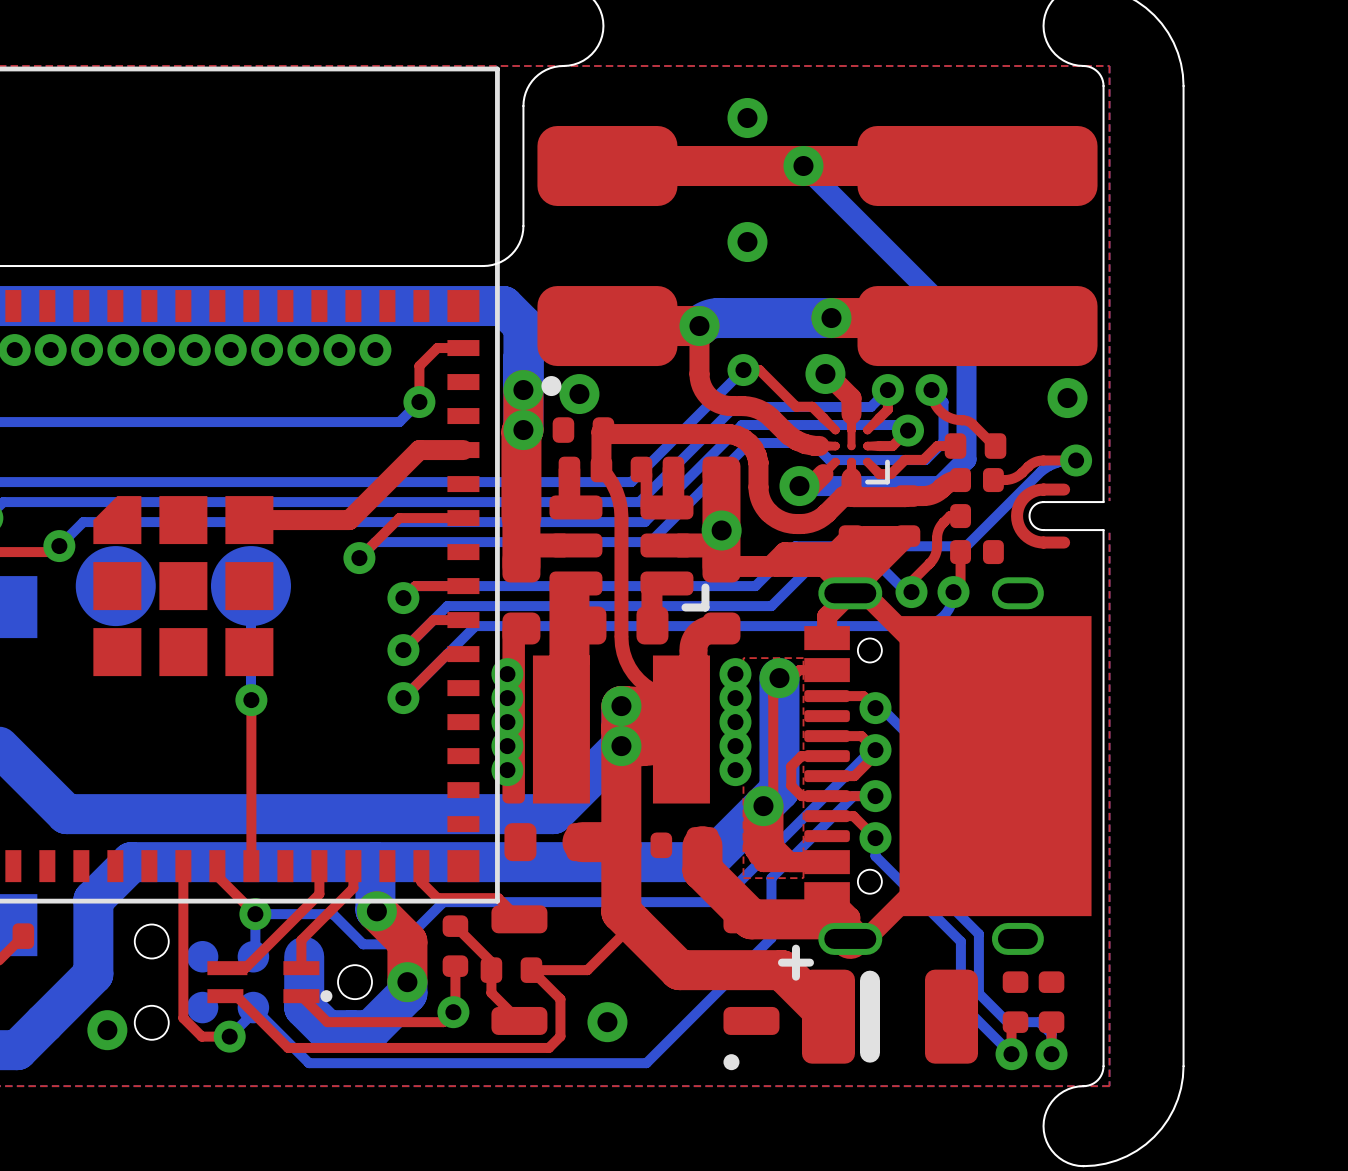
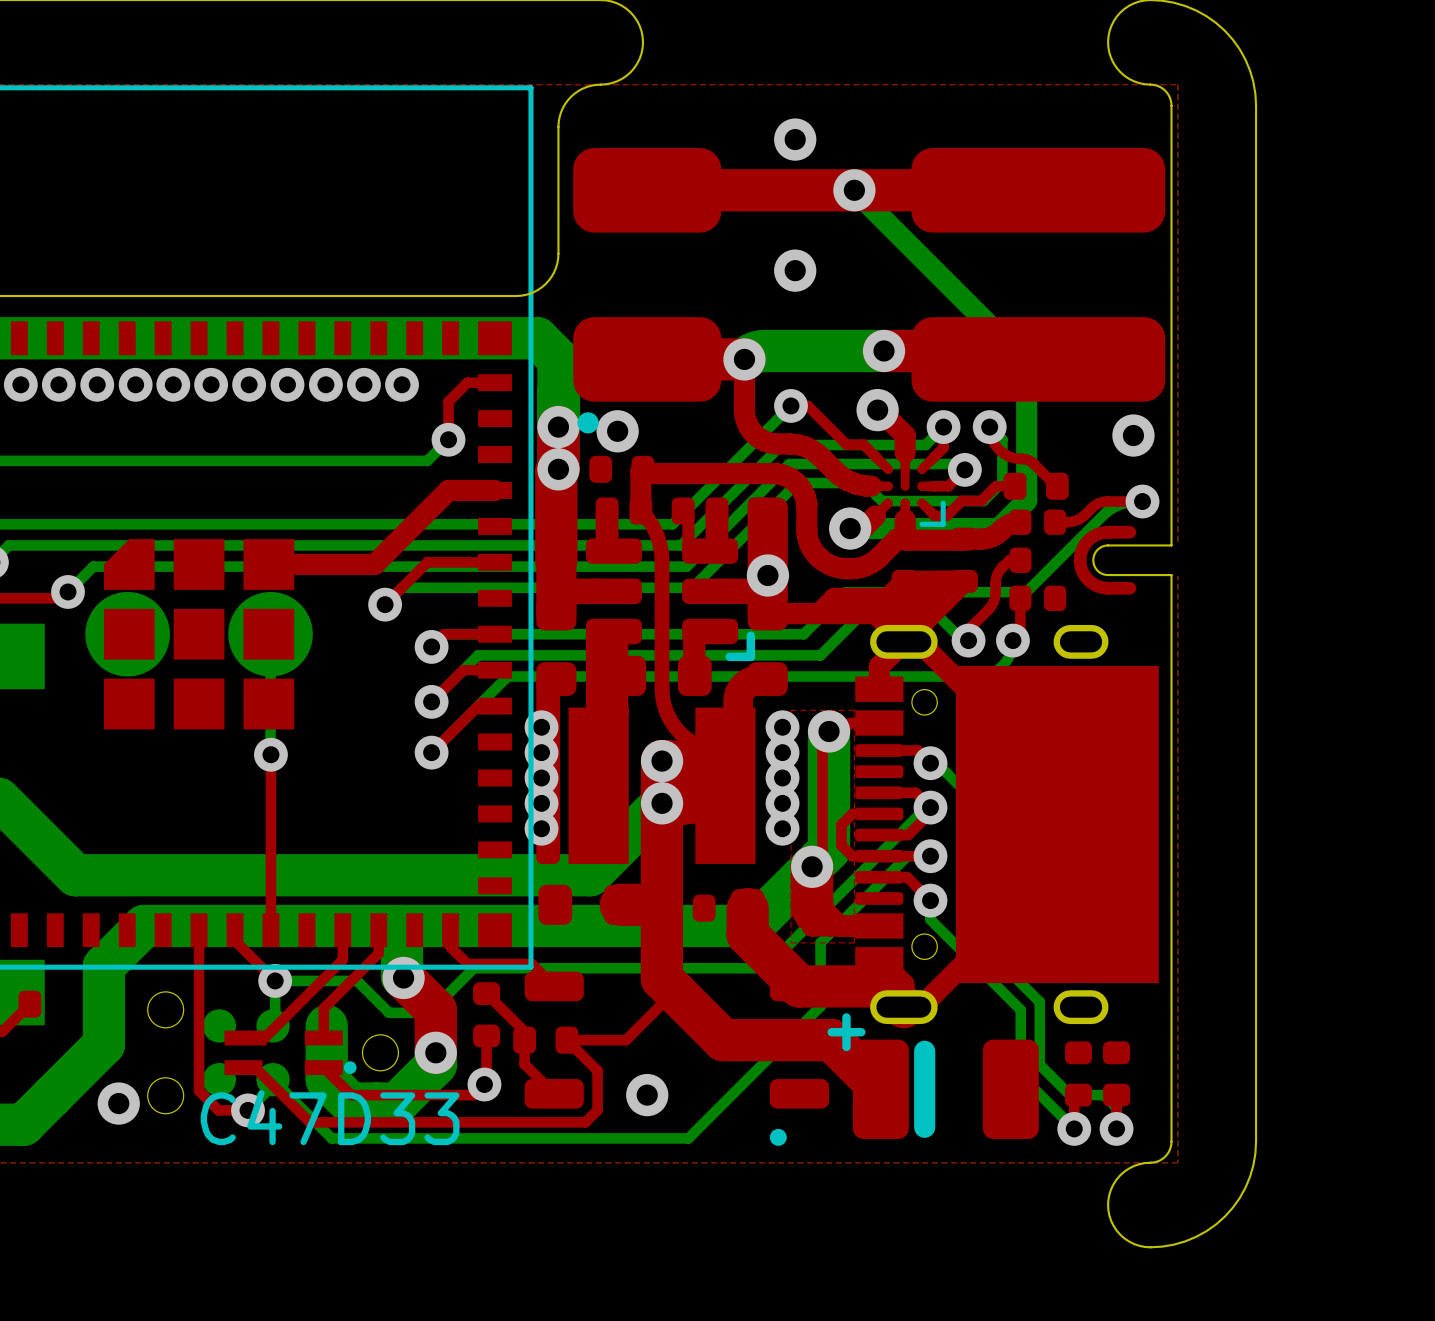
text: none -> C47D33 (330, 1117)

